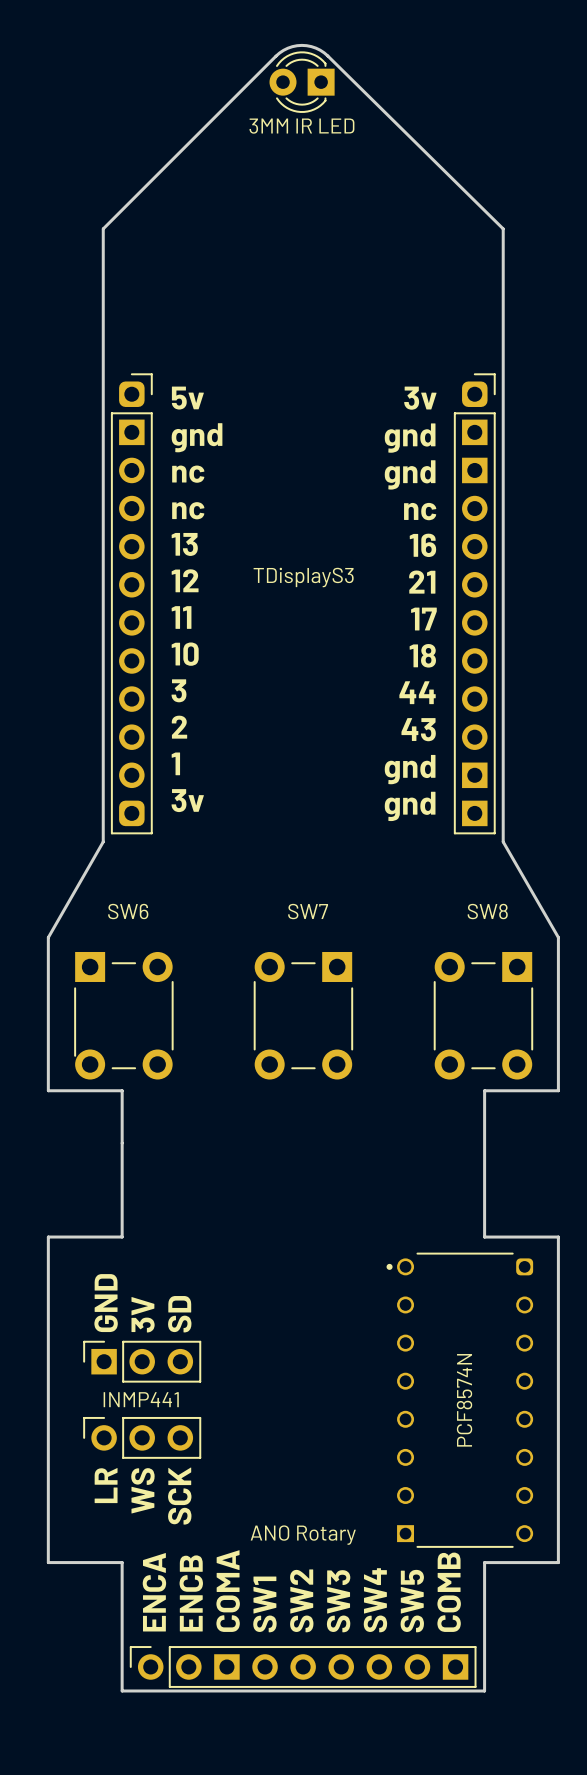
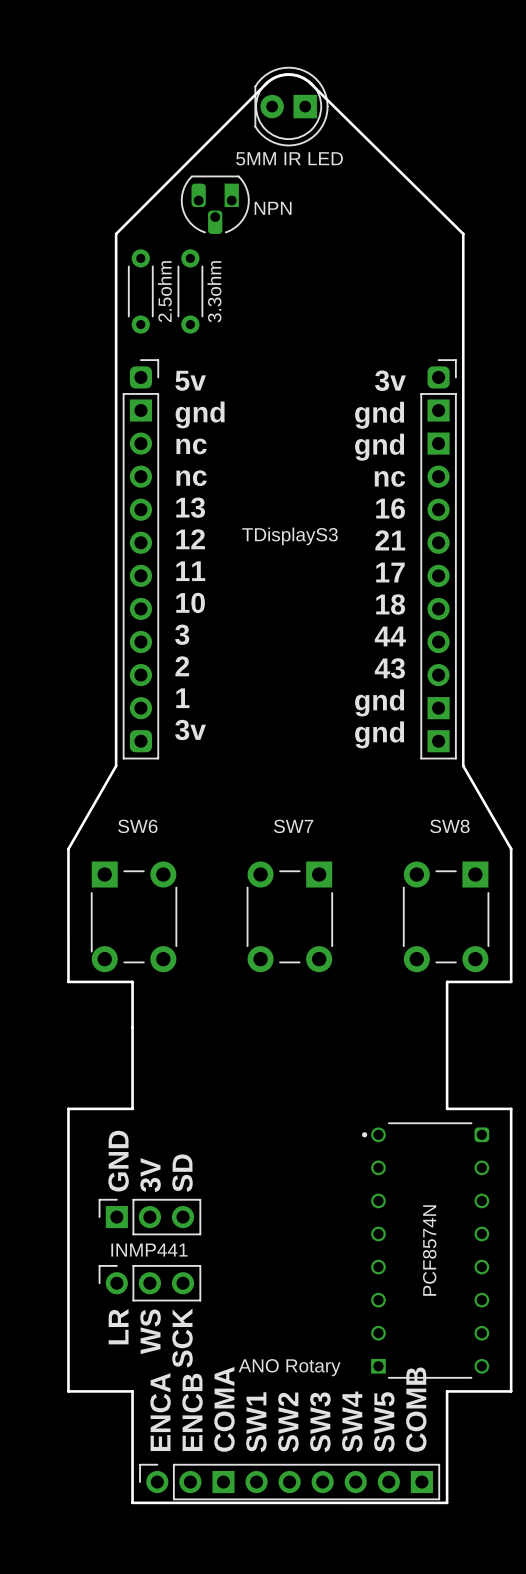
3MM IR LED: (302, 82) -> none
5MM IR LED: none -> (291, 106)
NPN: none -> (215, 204)
2.5ohm: none -> (140, 291)
3.3ohm: none -> (190, 291)

